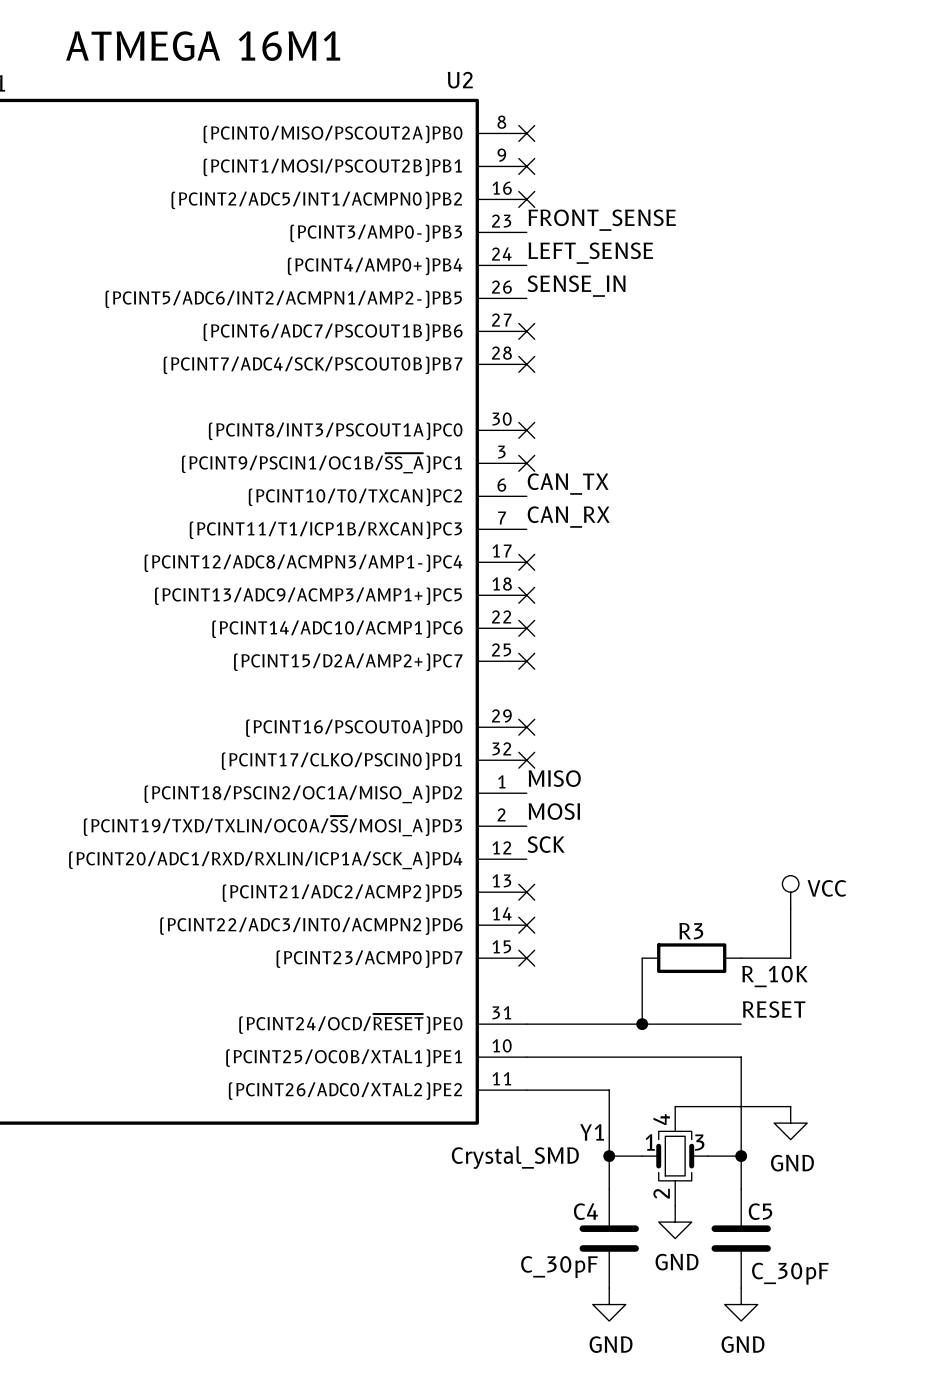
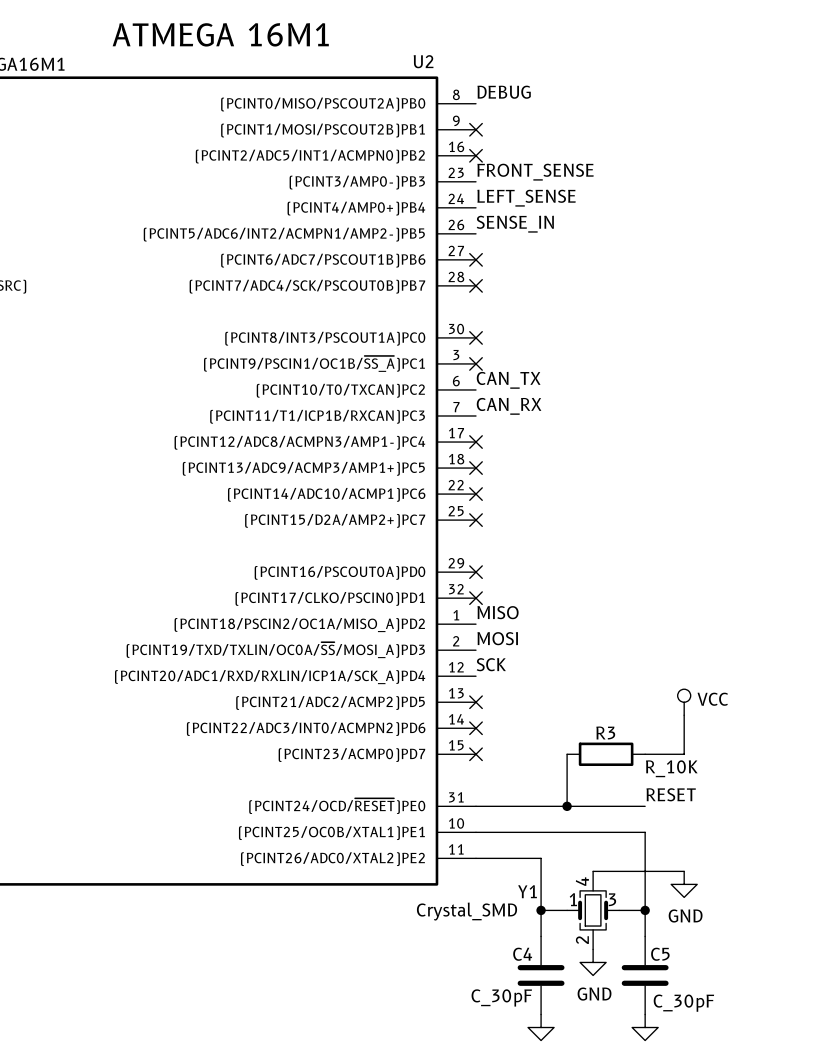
label: none -> DEBUG (504, 92)
no-connect mark: (526, 133) -> none

